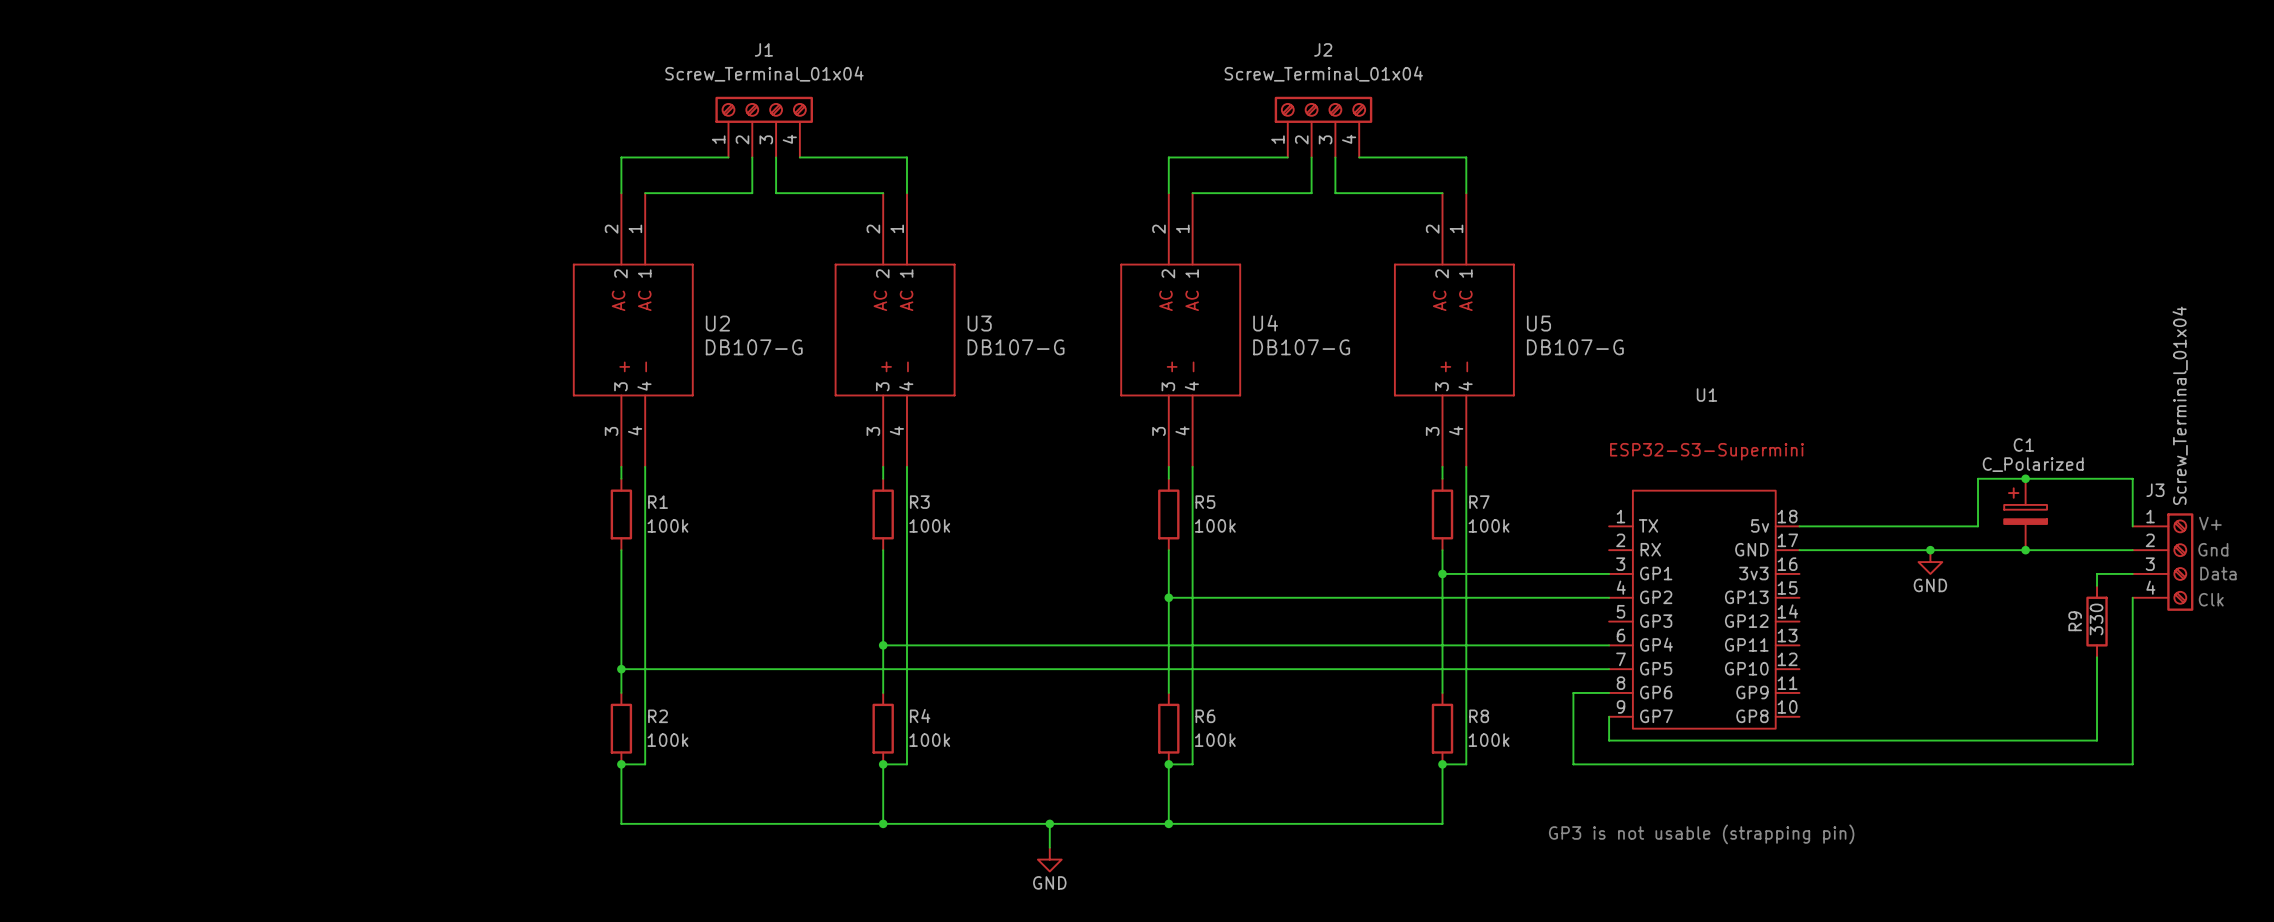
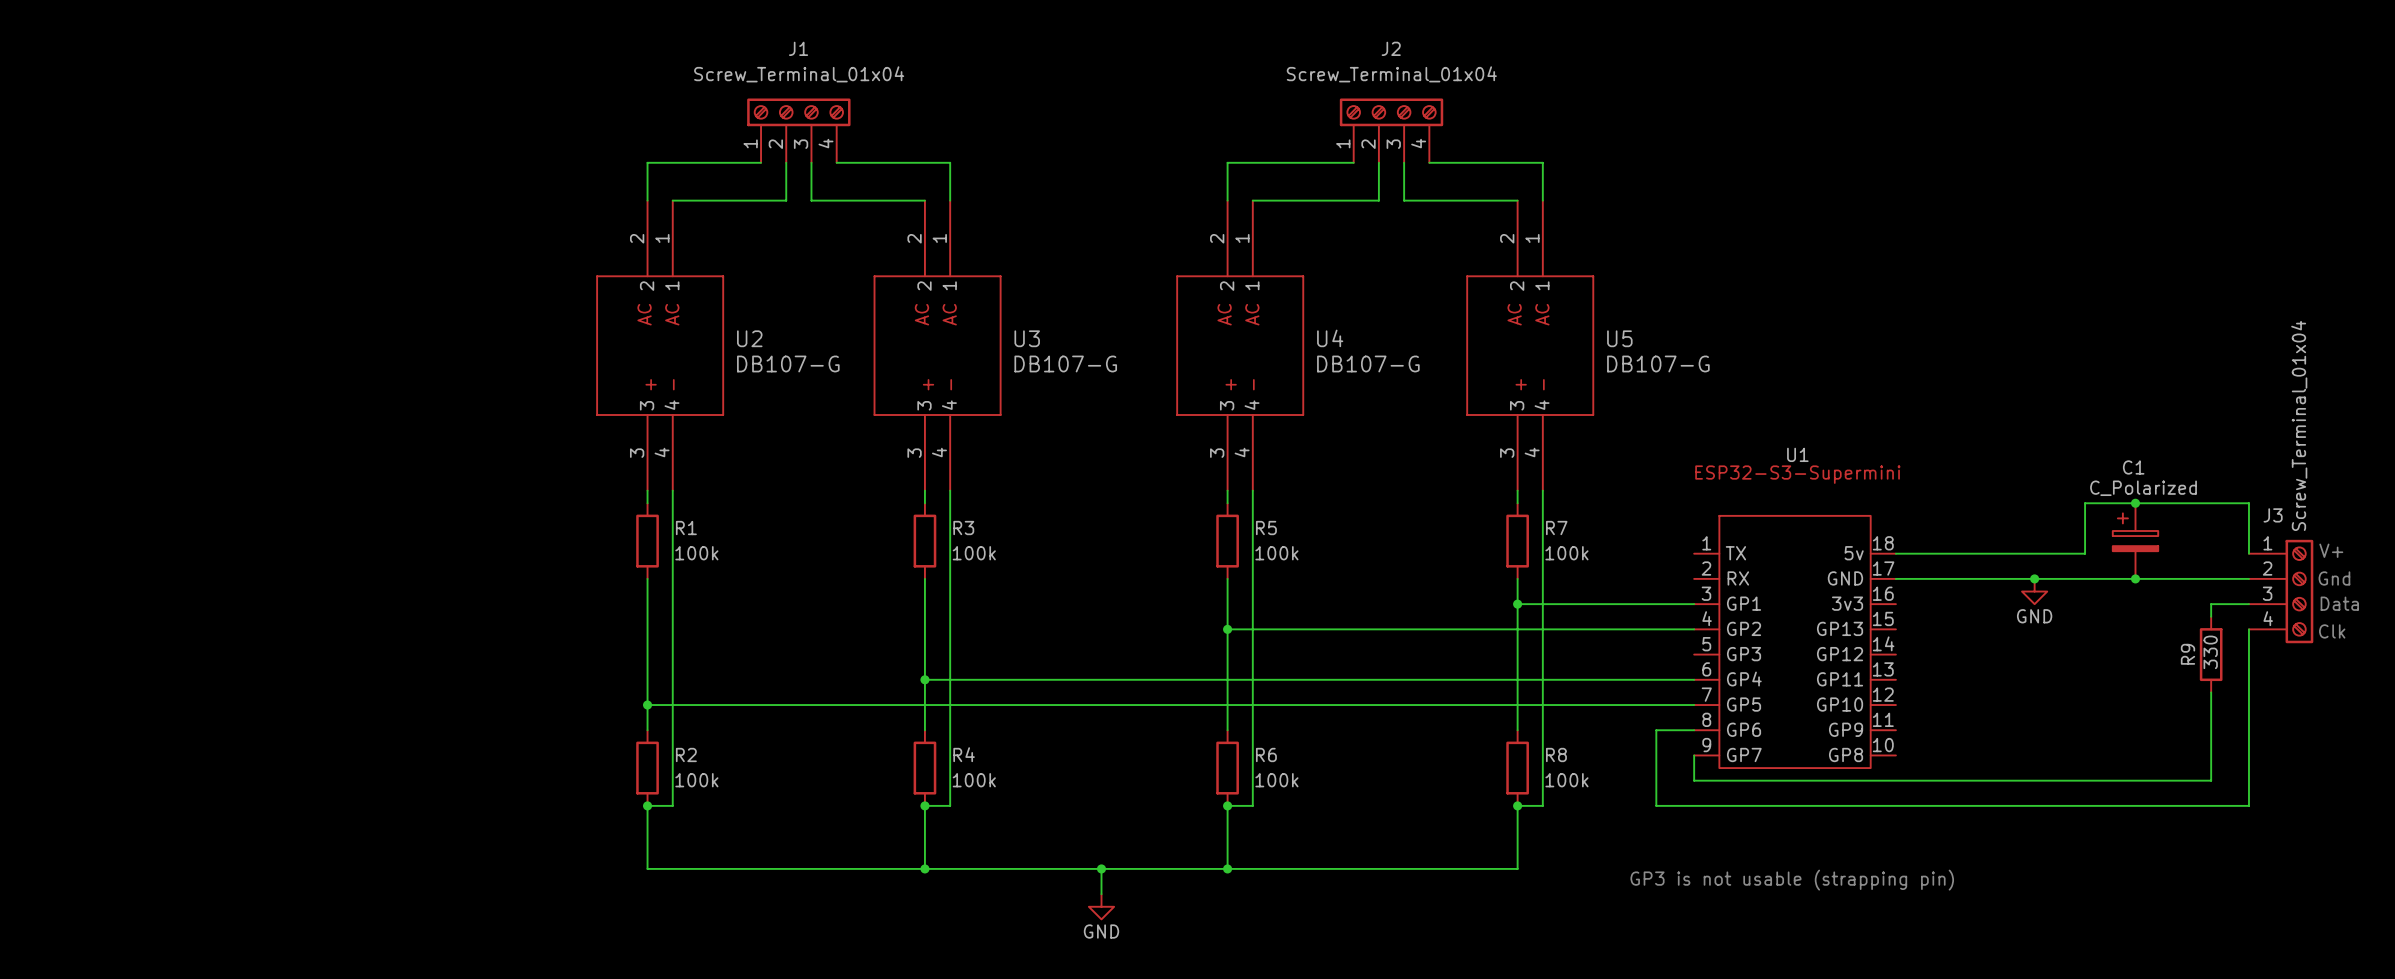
U1 name position: U1 (1706, 395) -> U1 (1797, 454)

